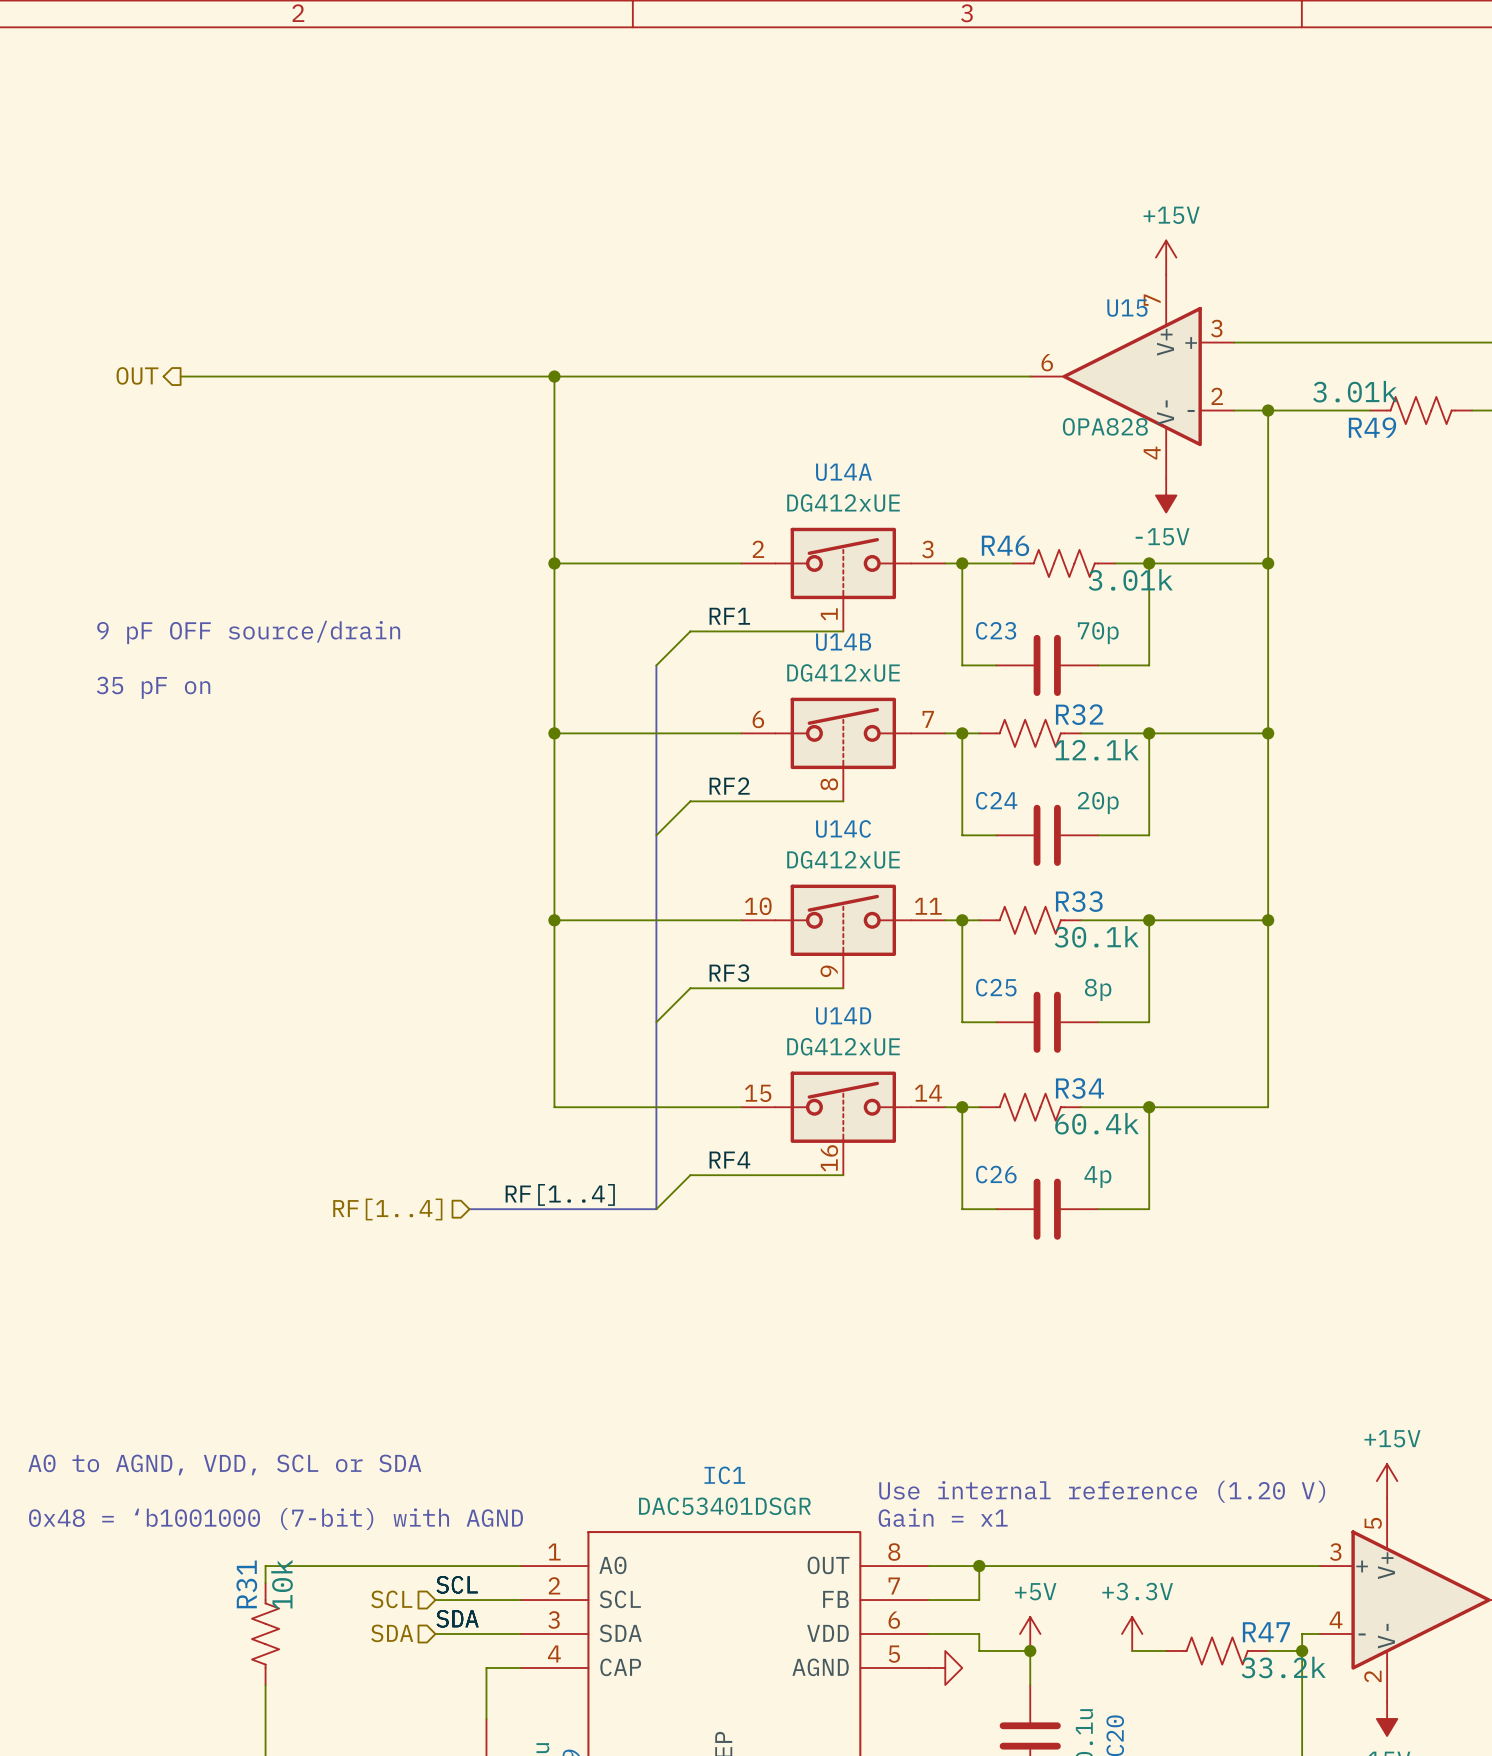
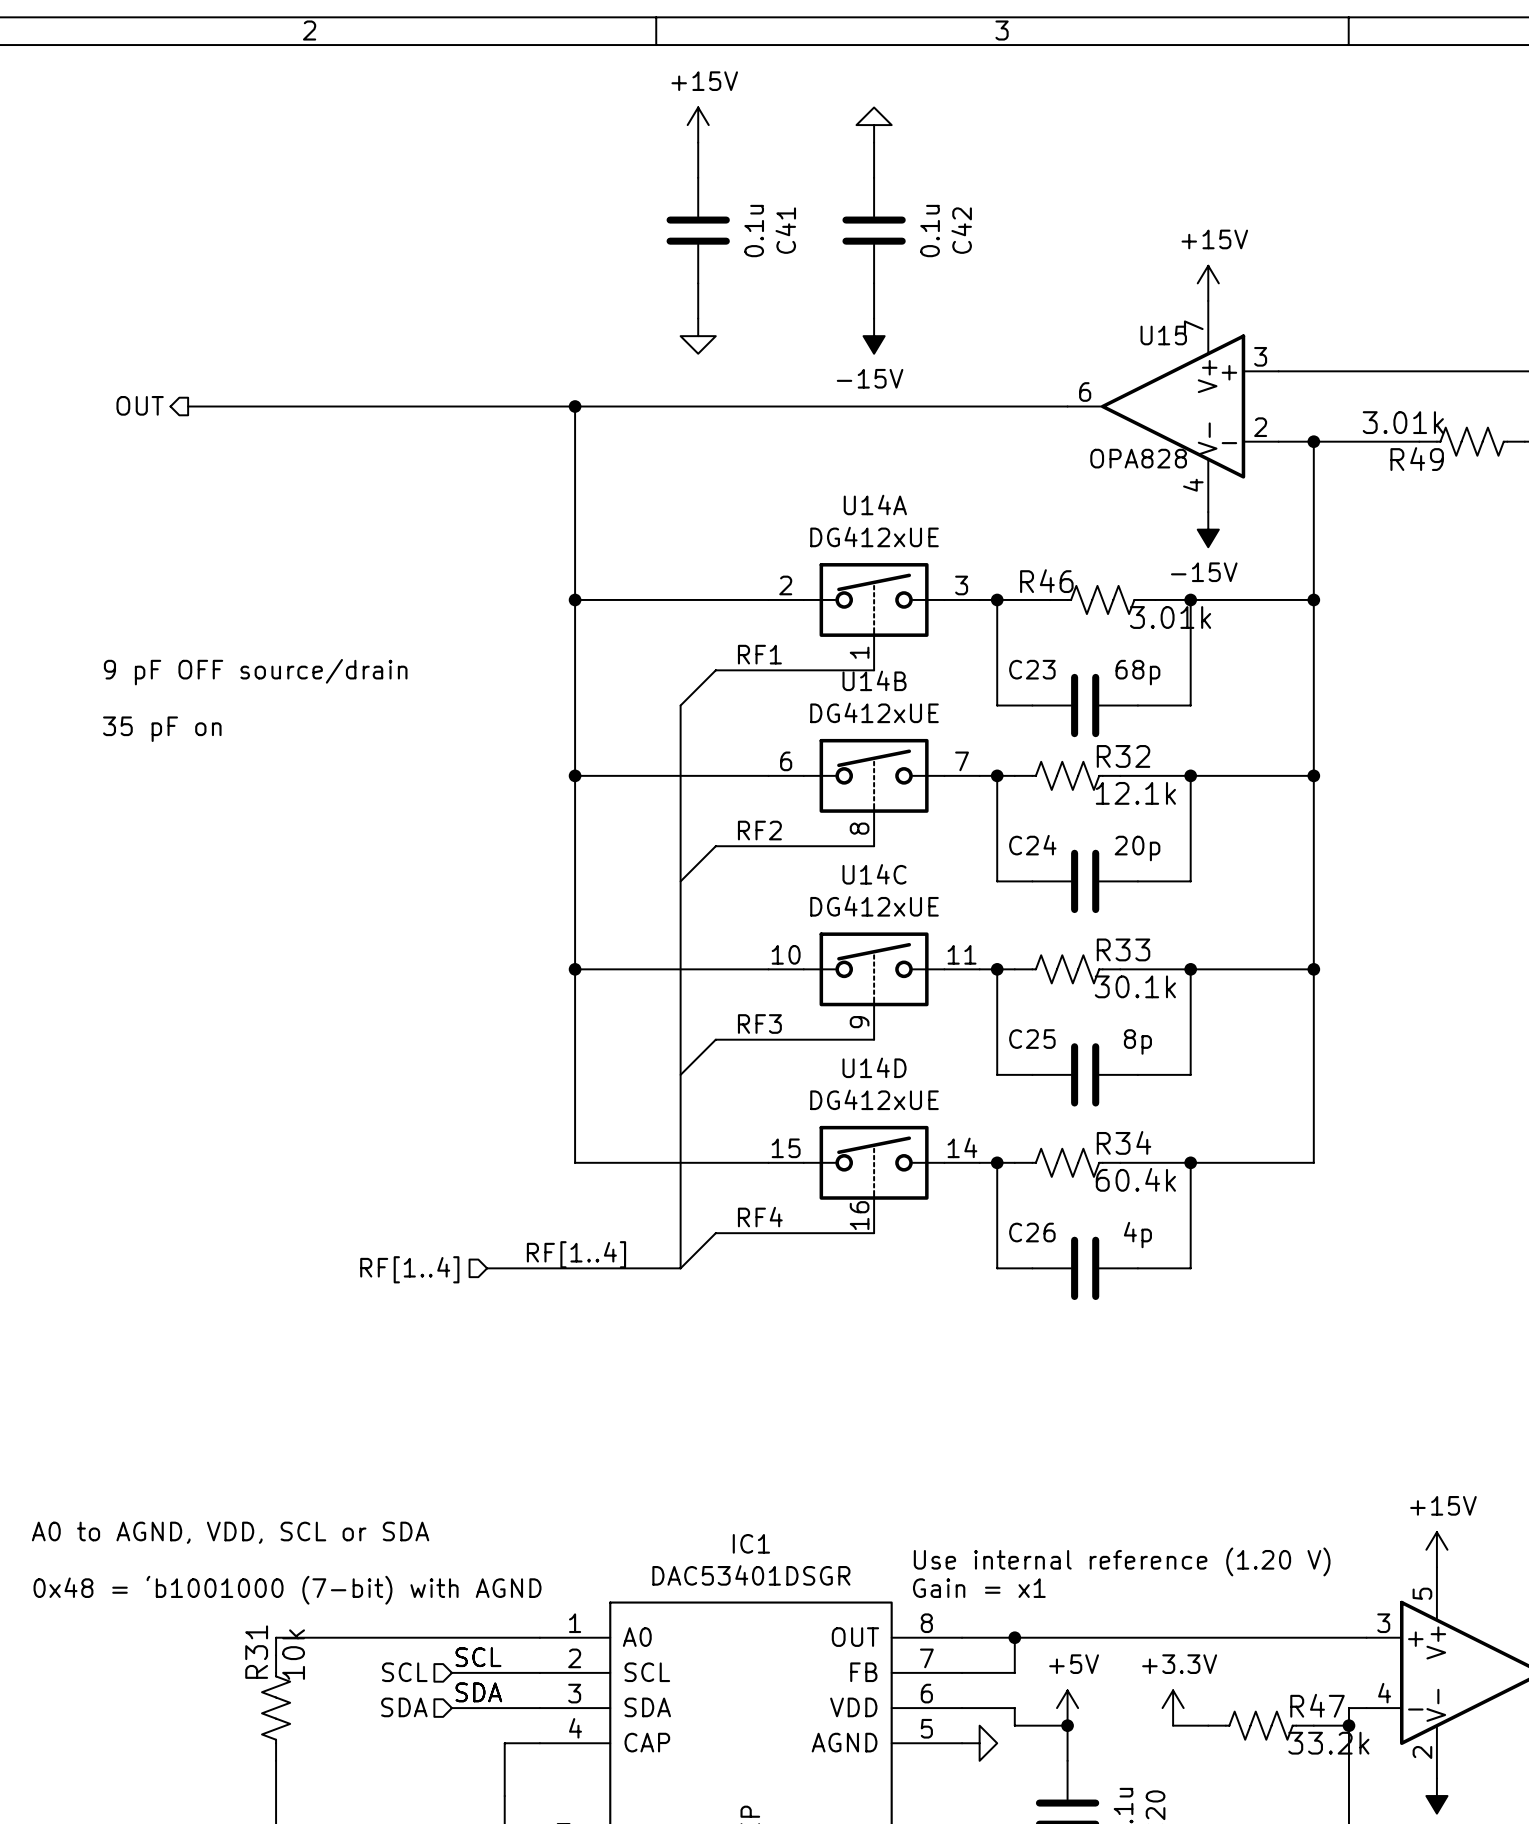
power symbol: none -> +15V (698, 125)
power symbol: none -> (874, 125)
wire: none -> (698, 142) (698, 177)
wire: none -> (874, 142) (874, 177)
C41: none -> 0.1u (698, 230)
C42: none -> 0.1u (874, 230)
wire: none -> (698, 283) (698, 318)
wire: none -> (874, 283) (874, 318)
power symbol: none -> (698, 336)
power symbol: none -> -15V (874, 336)
C23 value: 70p (1098, 633) -> 68p (1137, 672)

